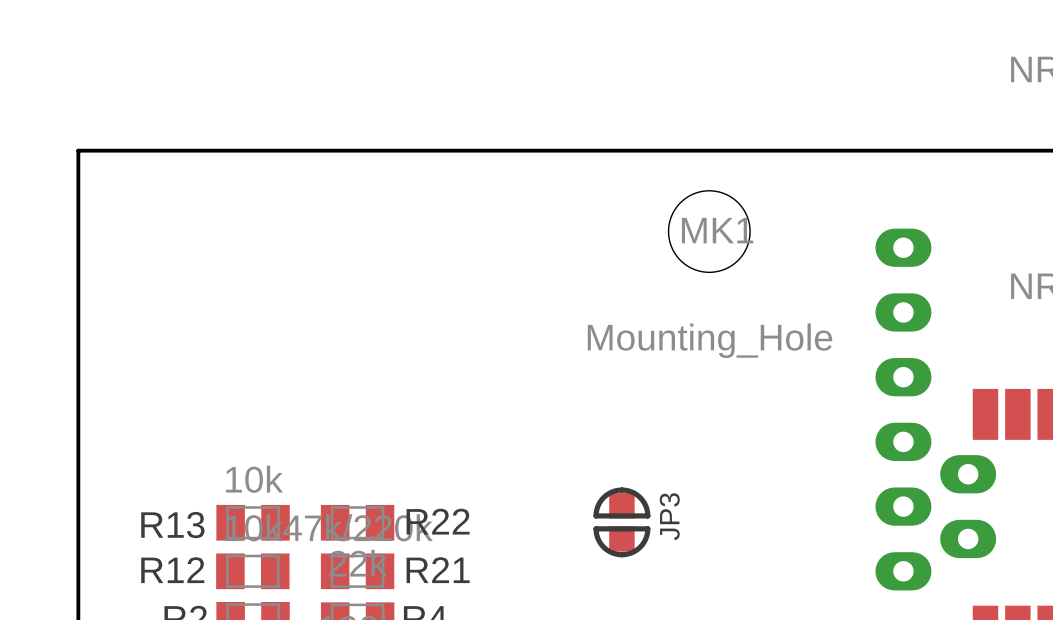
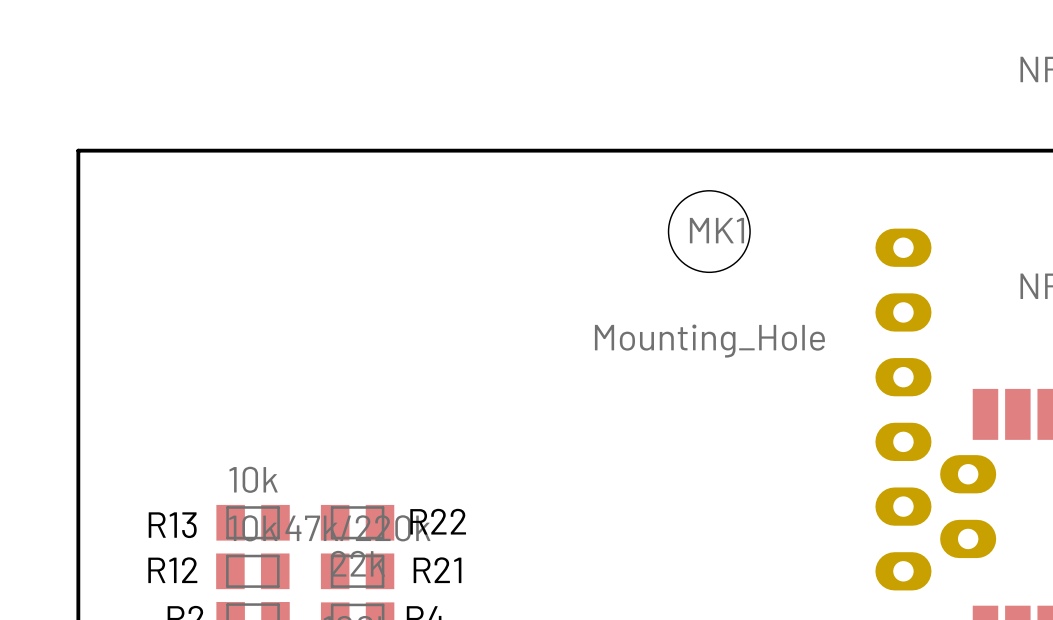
JP3: (621, 522) -> none

